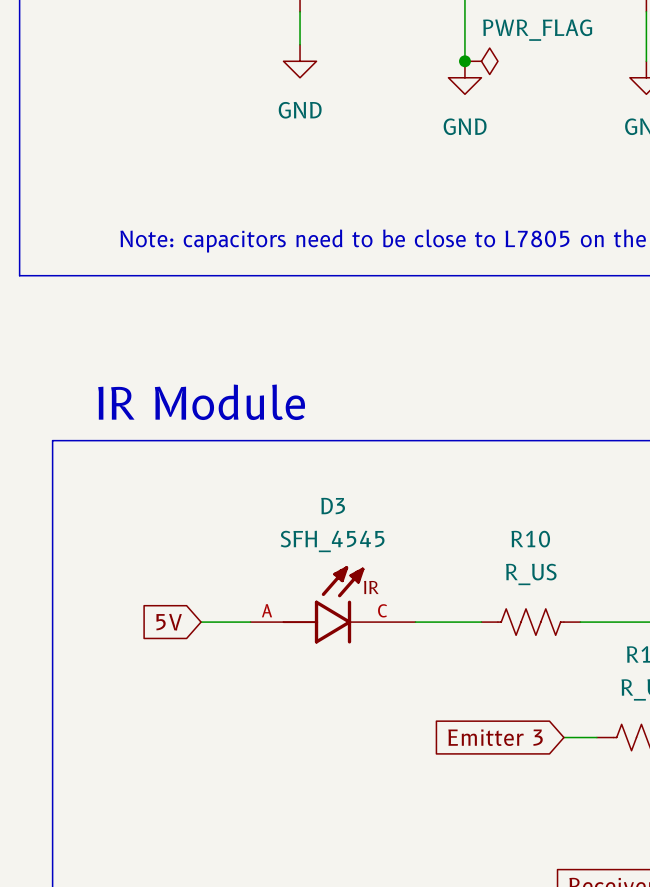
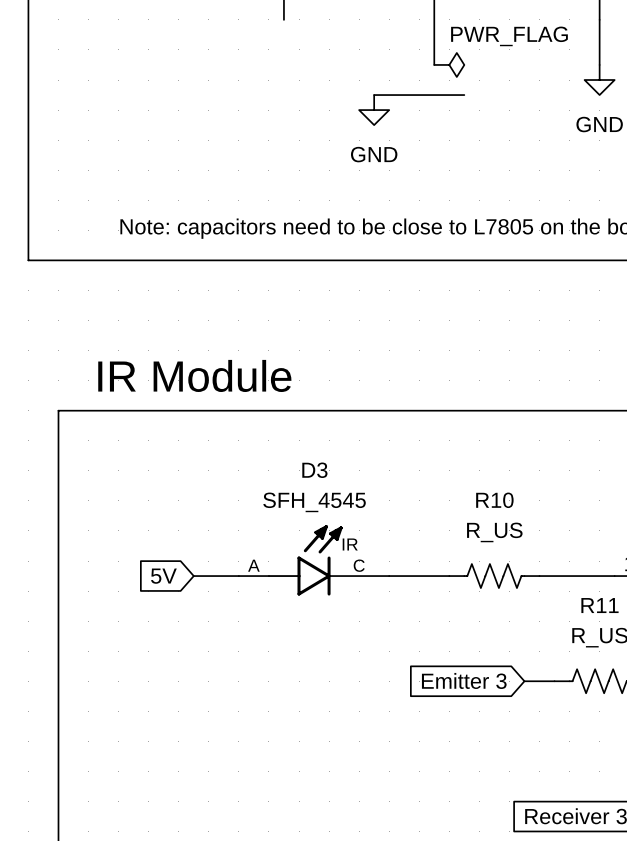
wire: (300, 11) (300, 44) -> none
power symbol: GND (300, 61) -> none
junction: (464, 61) -> none
power symbol: GND (464, 77) -> none
wire: none -> (374, 95) (464, 95)
power symbol: none -> GND (374, 110)

